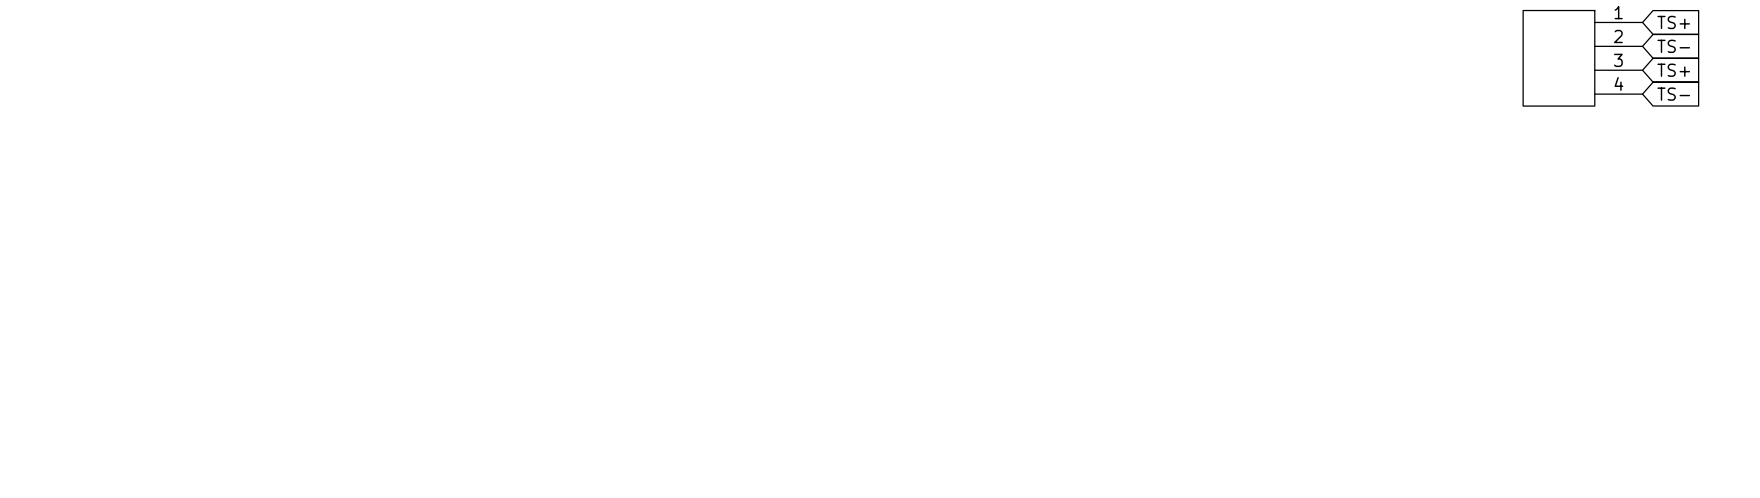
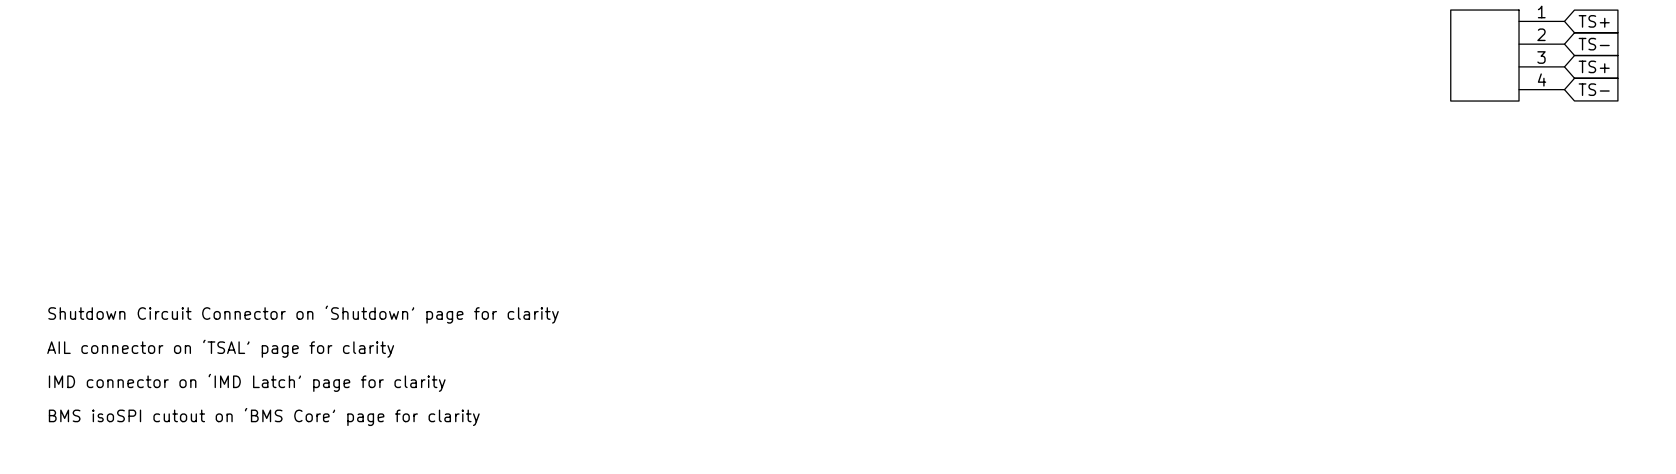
text: none -> Shutdown Circuit Connector on ‘Shutdown’ page for clarity (303, 314)
text: none -> AIL connector on ‘TSAL’ page for clarity (220, 348)
text: none -> IMD connector on ‘IMD Latch’ page for clarity (247, 382)
text: none -> BMS isoSPI cutout on ‘BMS Core’ page for clarity (264, 416)

